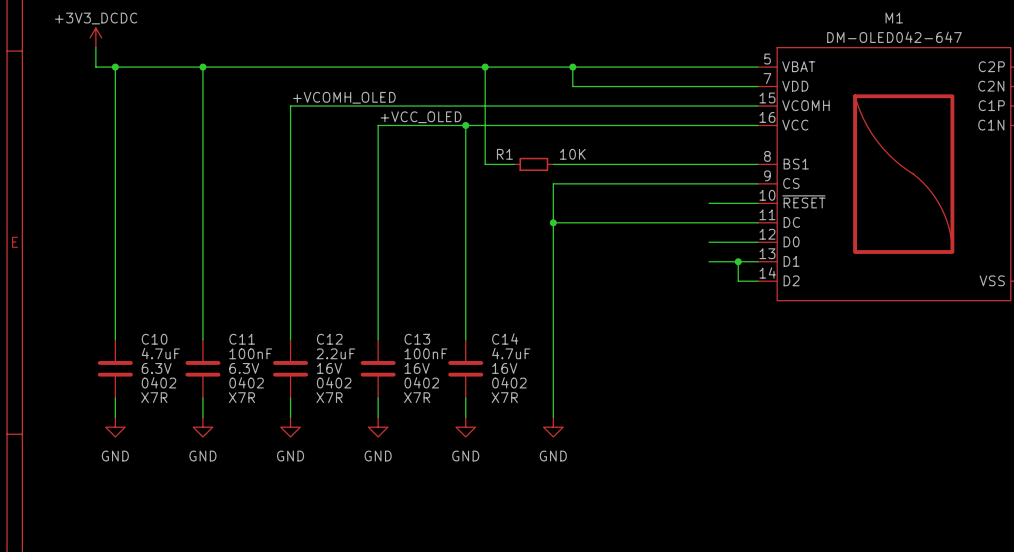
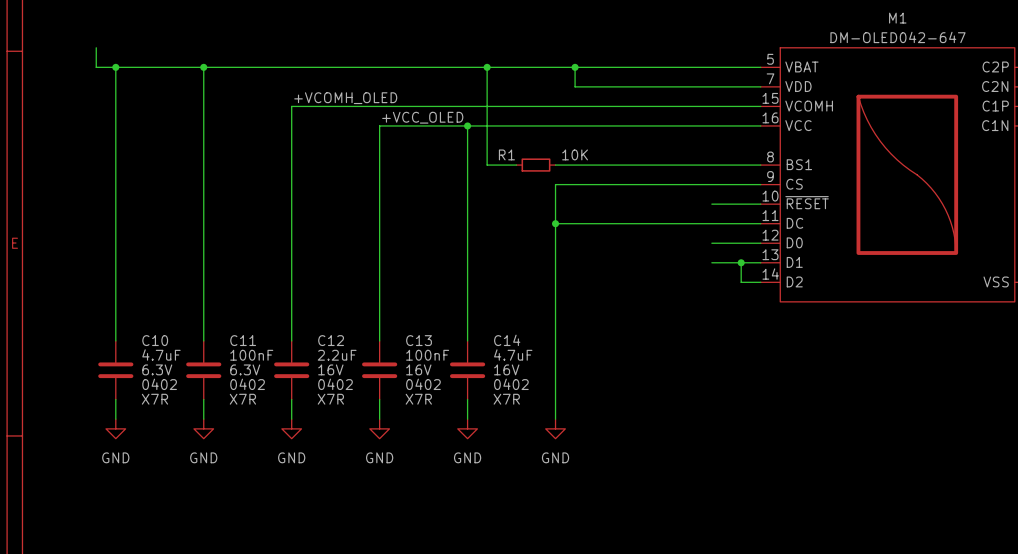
power symbol: +3V3_DCDC (95, 37) -> none

